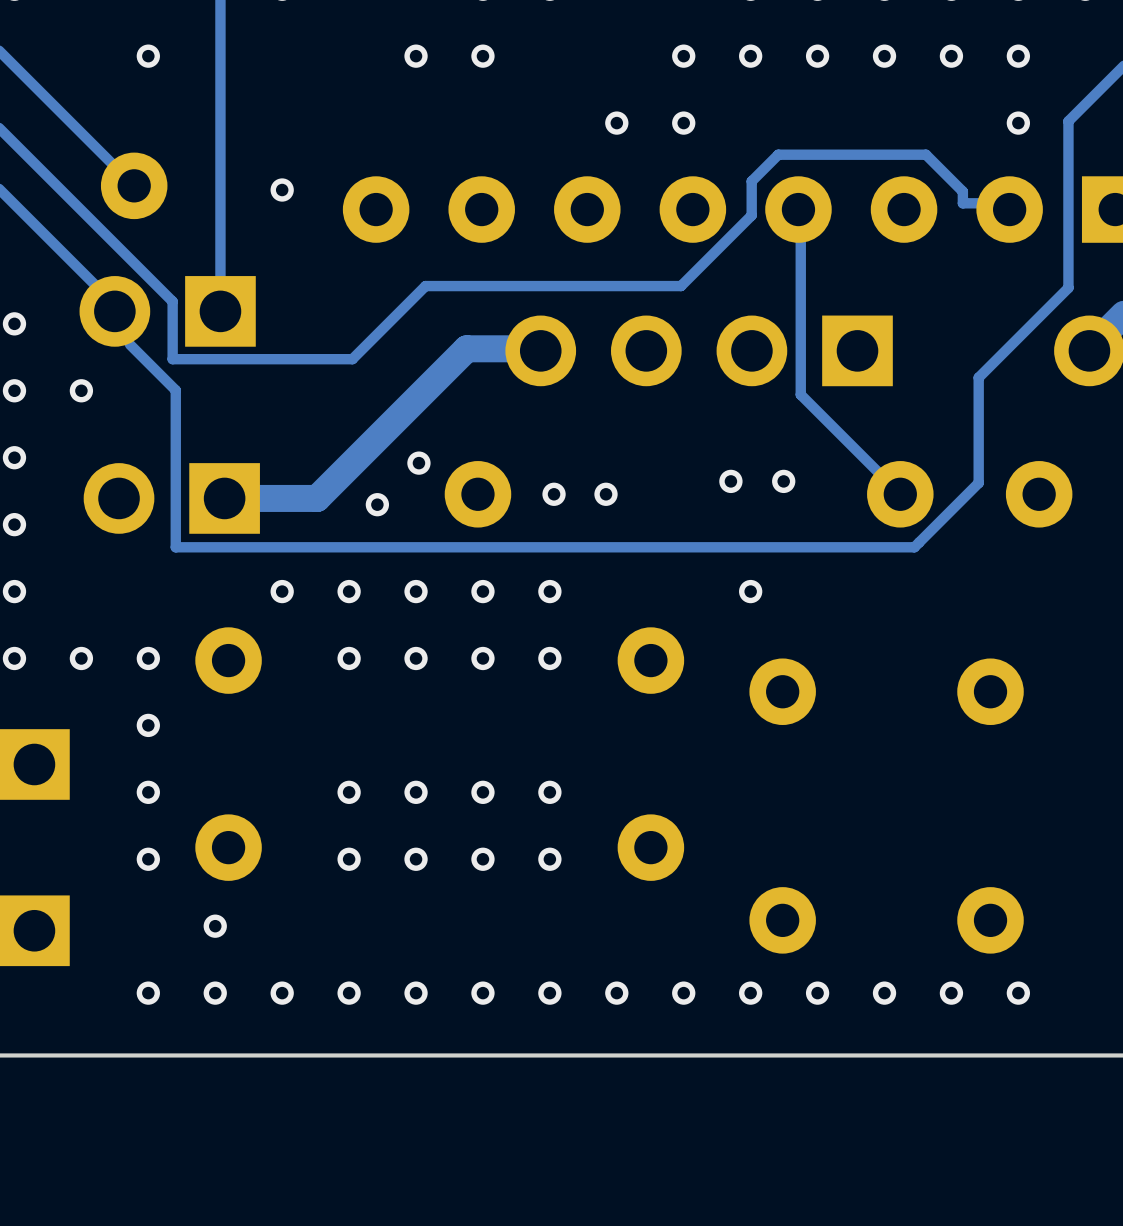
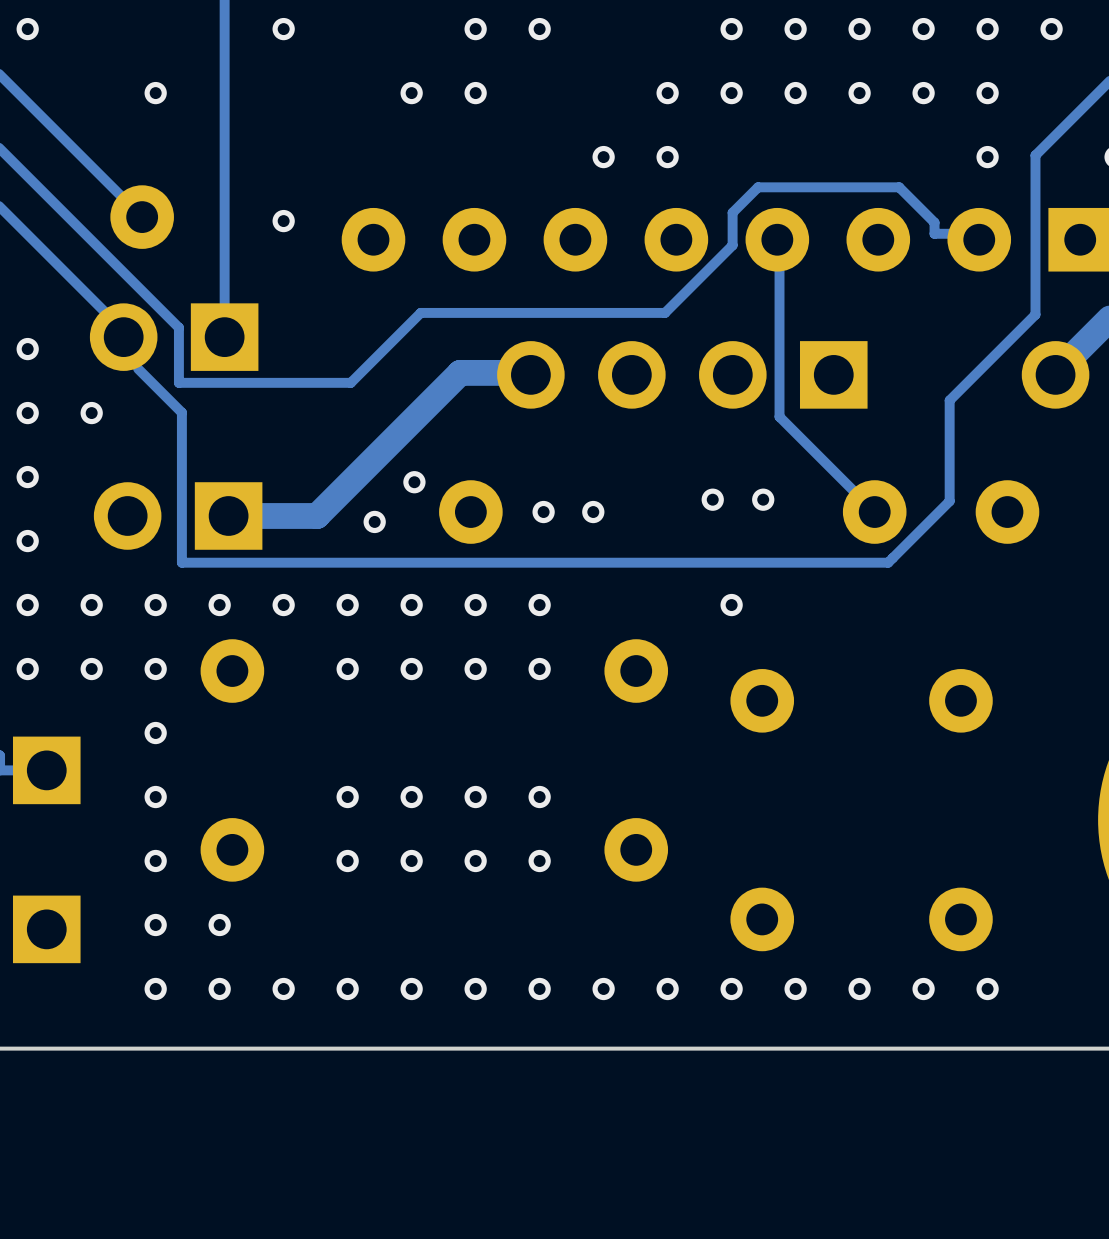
via: none -> (91, 605)
via: none -> (155, 605)
via: none -> (219, 605)
via: none -> (155, 925)

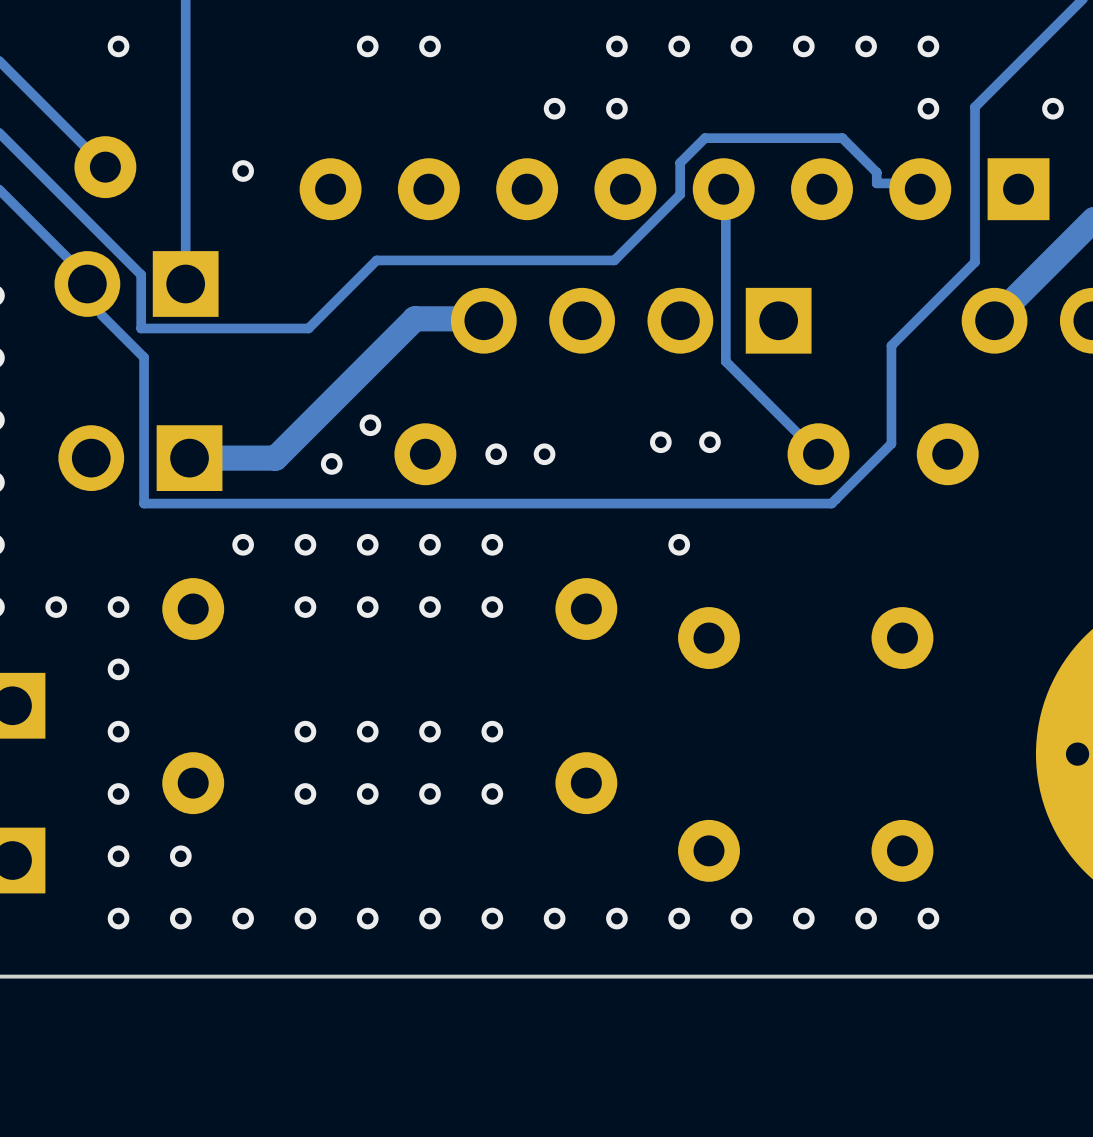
via: (91, 413) -> none
via: (91, 605) -> none
via: (155, 605) -> none
via: (219, 605) -> none

